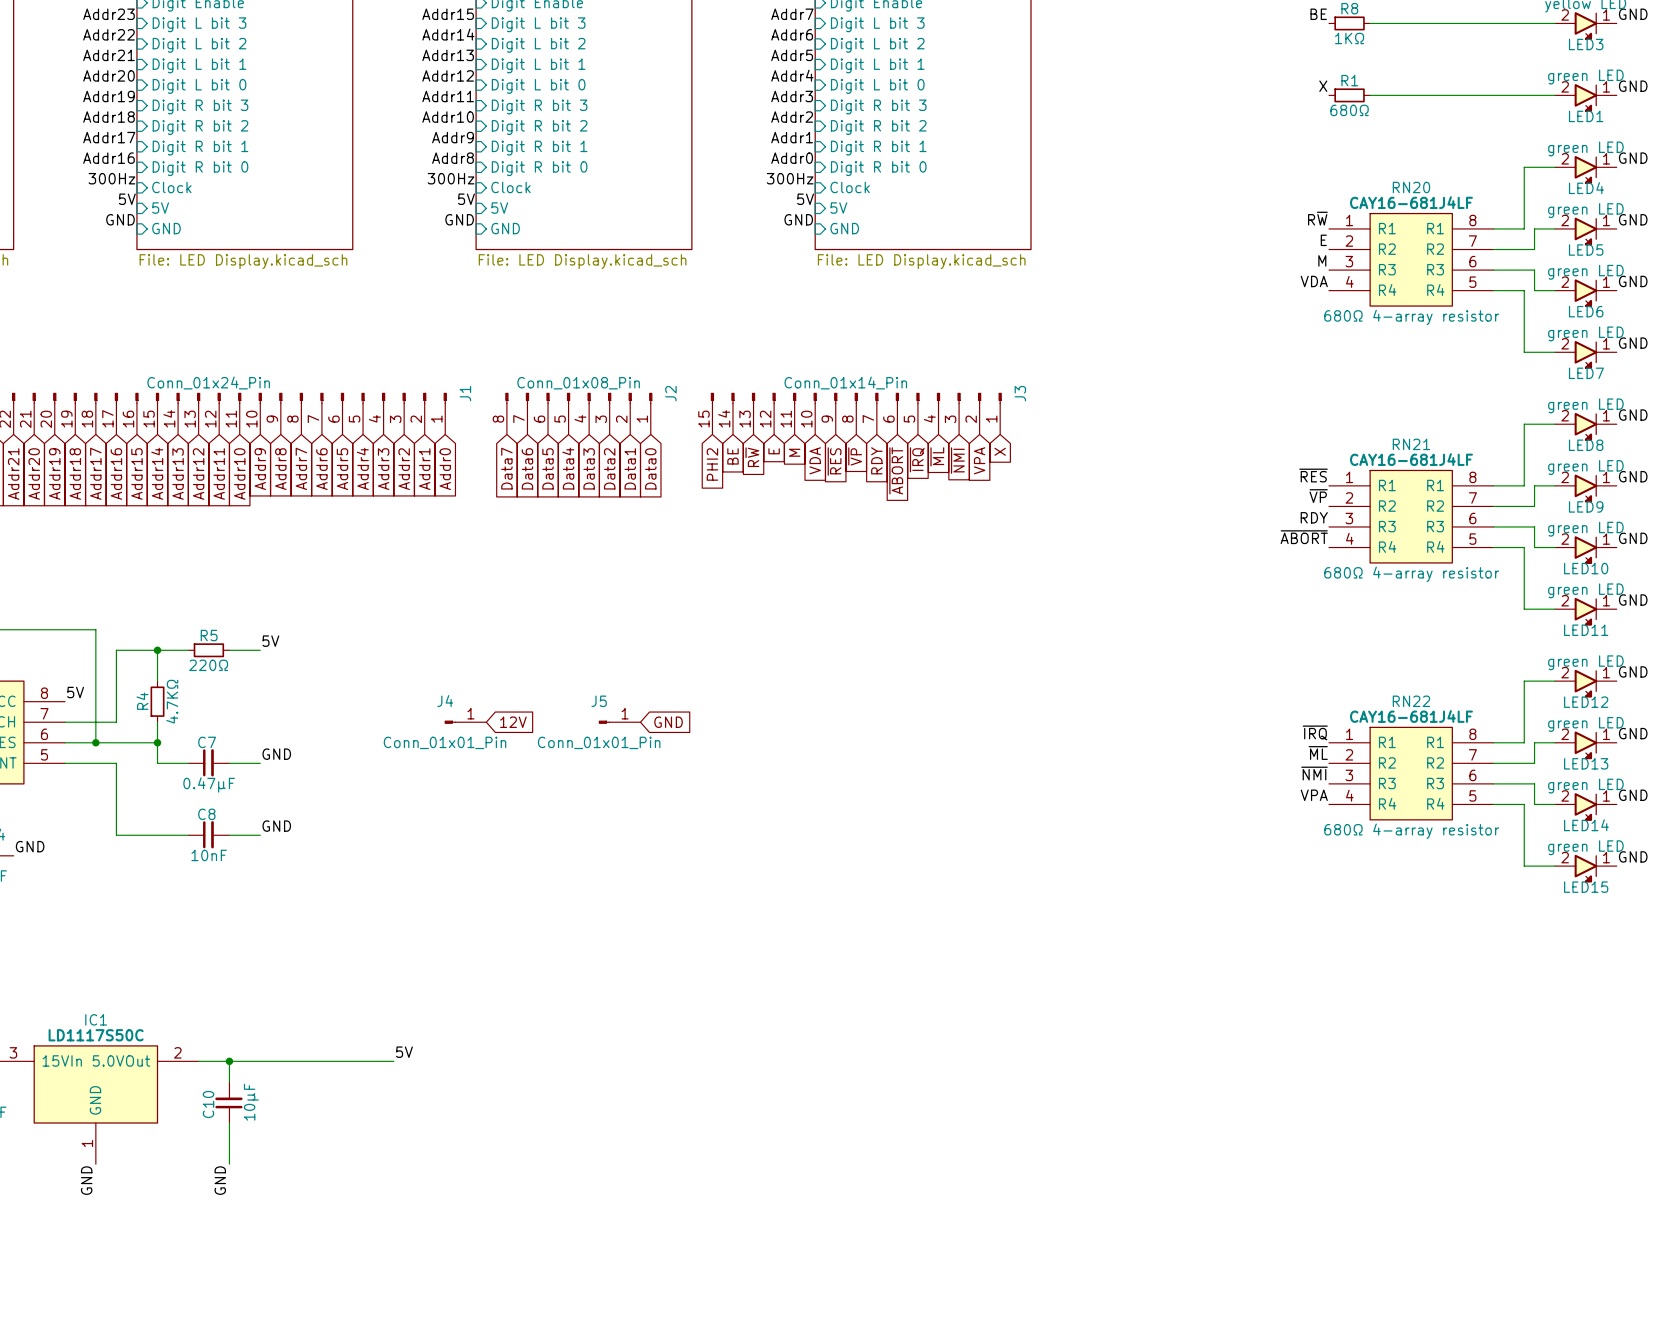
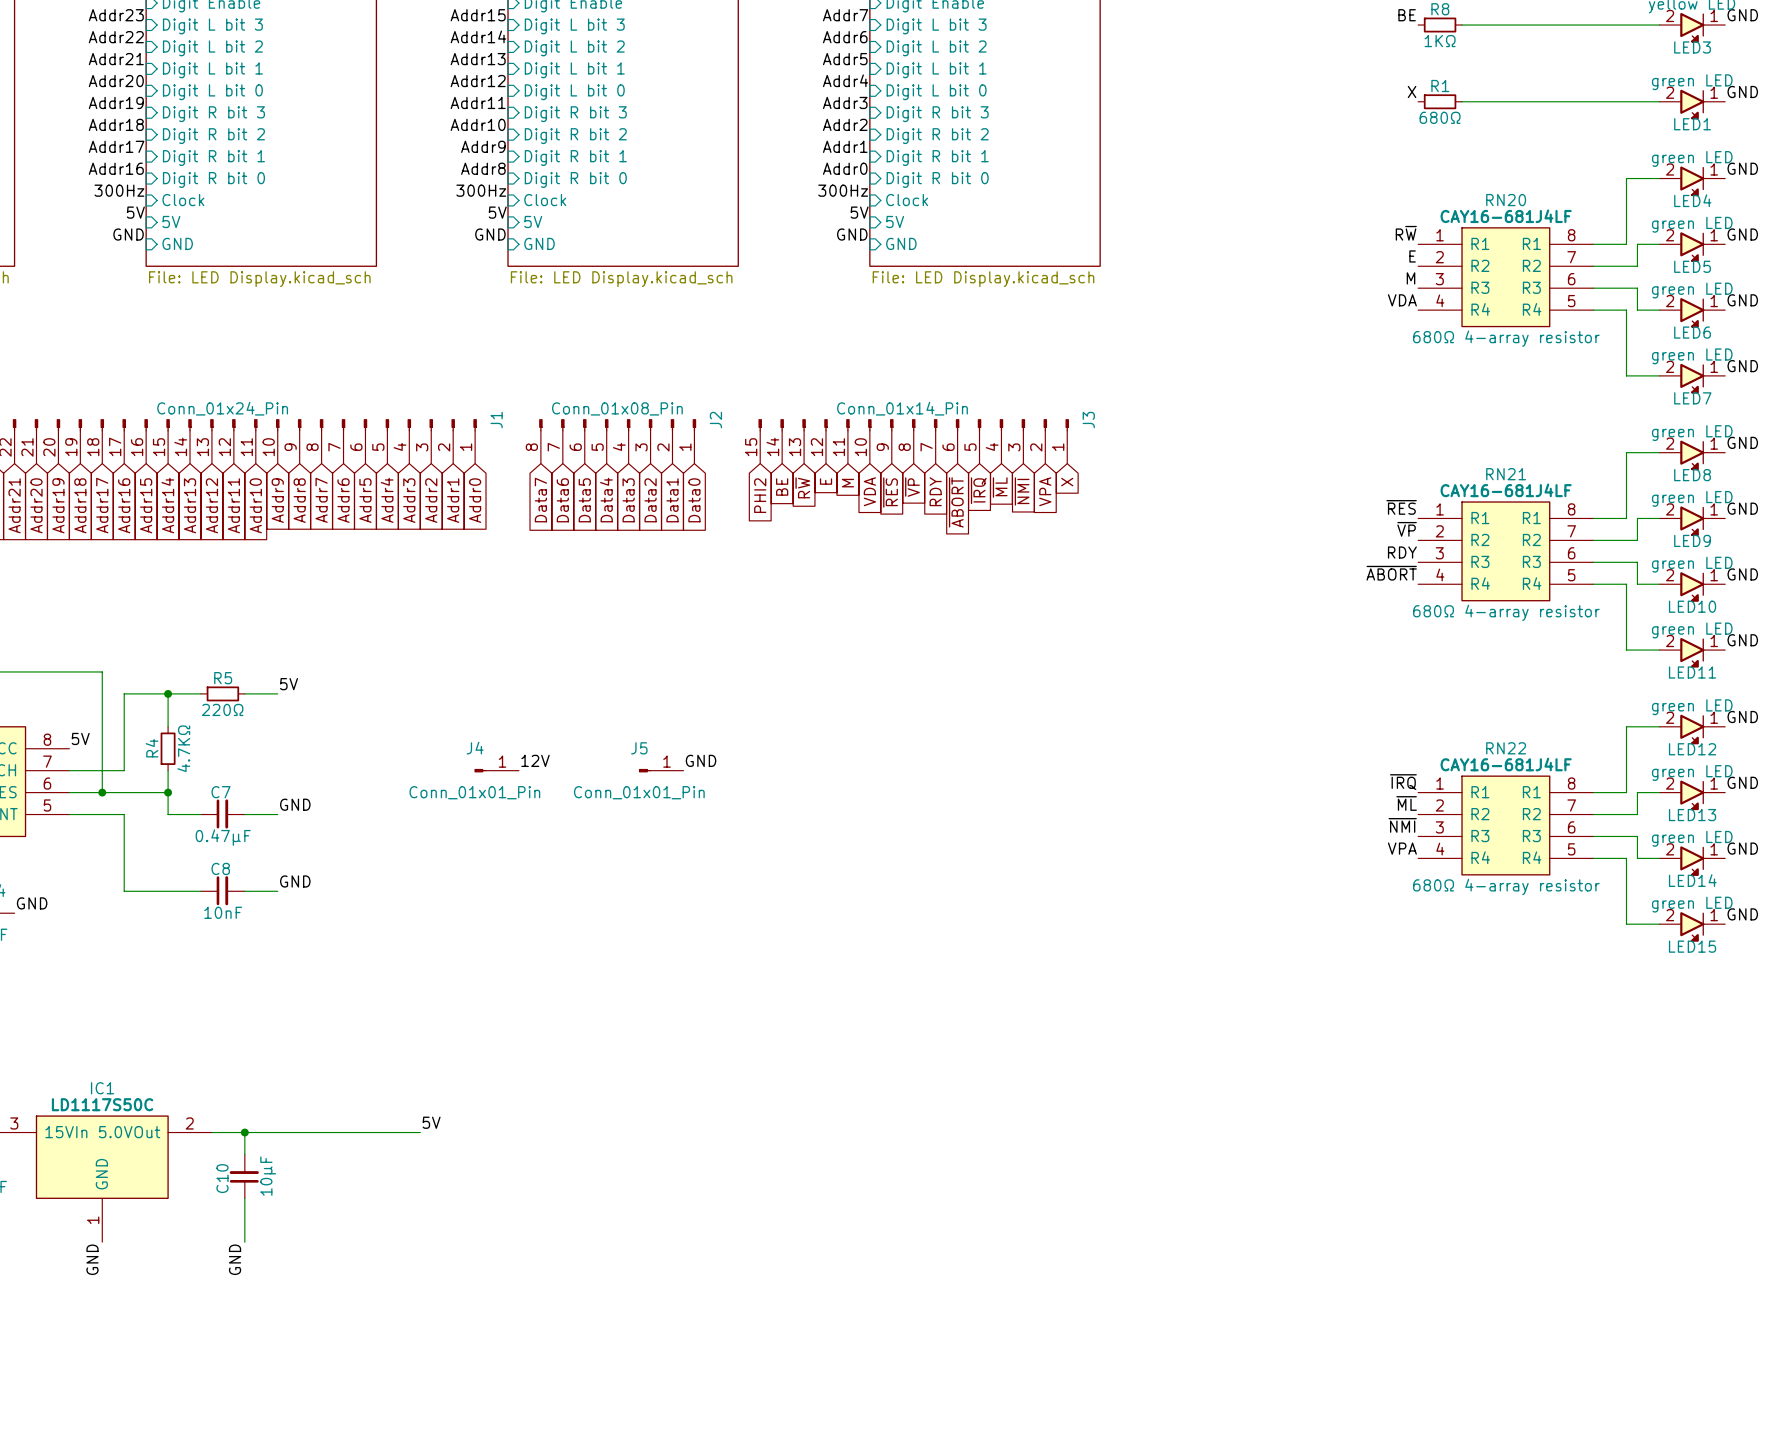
label: none -> 12V (535, 760)
label: none -> GND (701, 760)
global label: 12V (513, 722) -> none
global label: GND (668, 722) -> none

